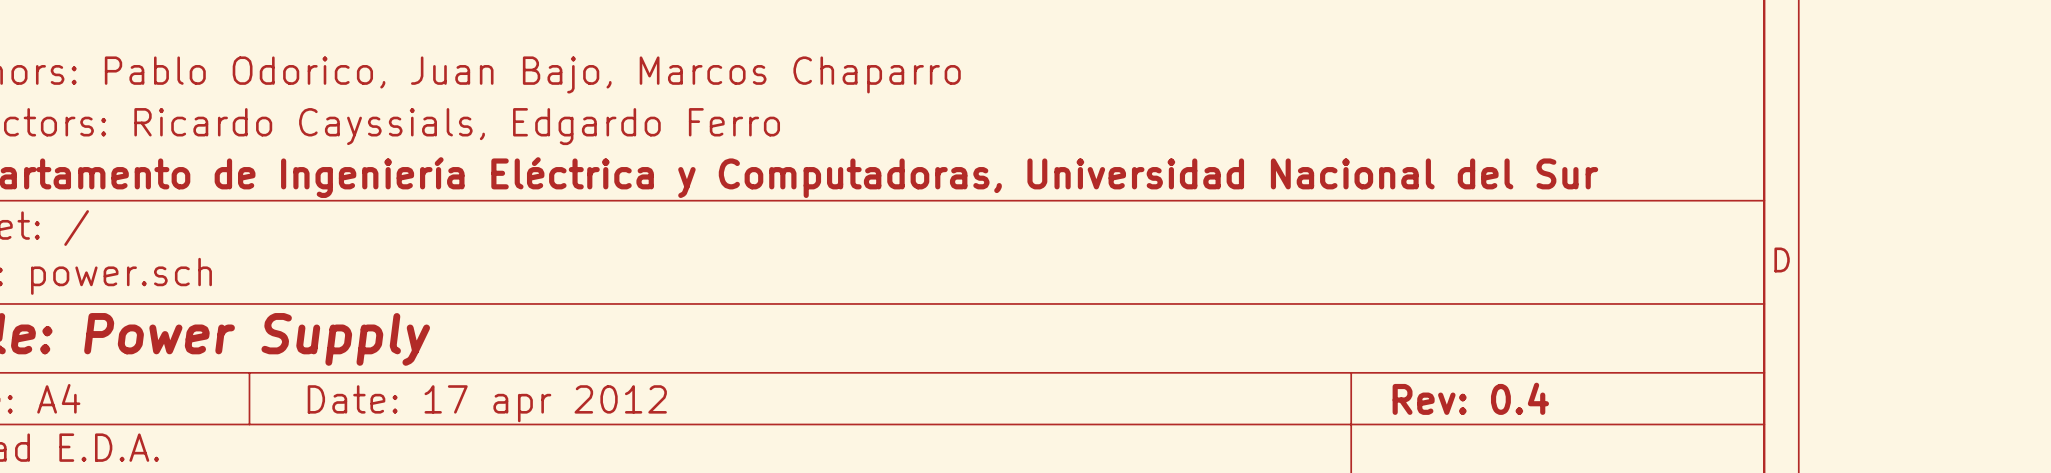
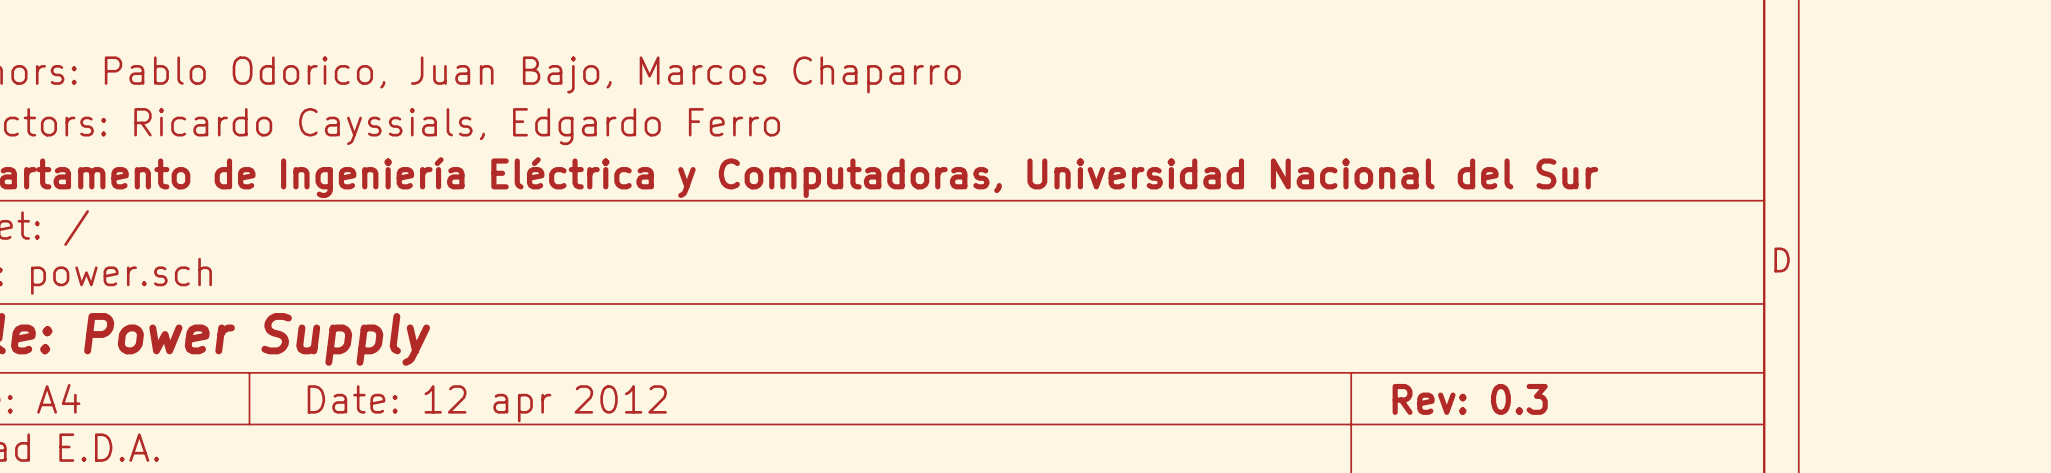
title block: Rev: 0.4 (1470, 398) -> Rev: 0.3 (1470, 399)
title block: Date: 17 apr 2012 (487, 403) -> Date: 12 apr 2012 (487, 403)

